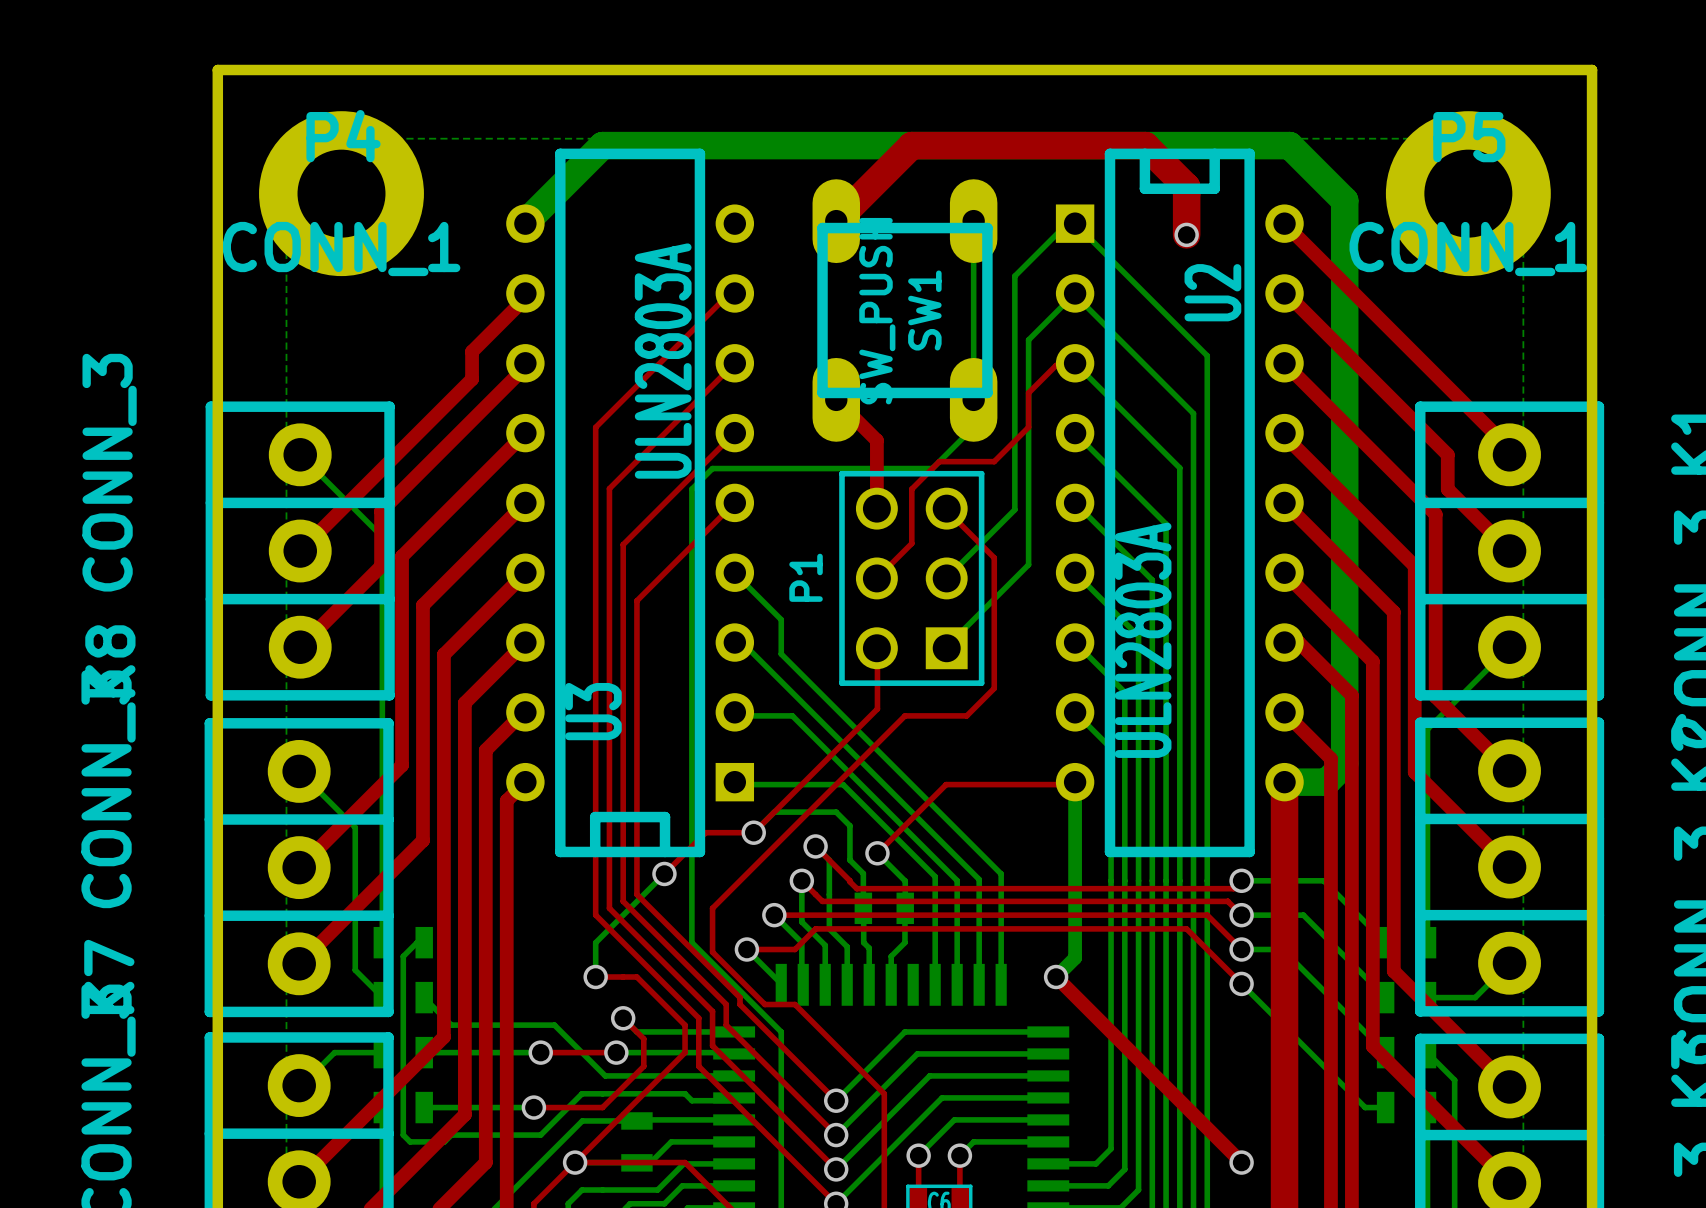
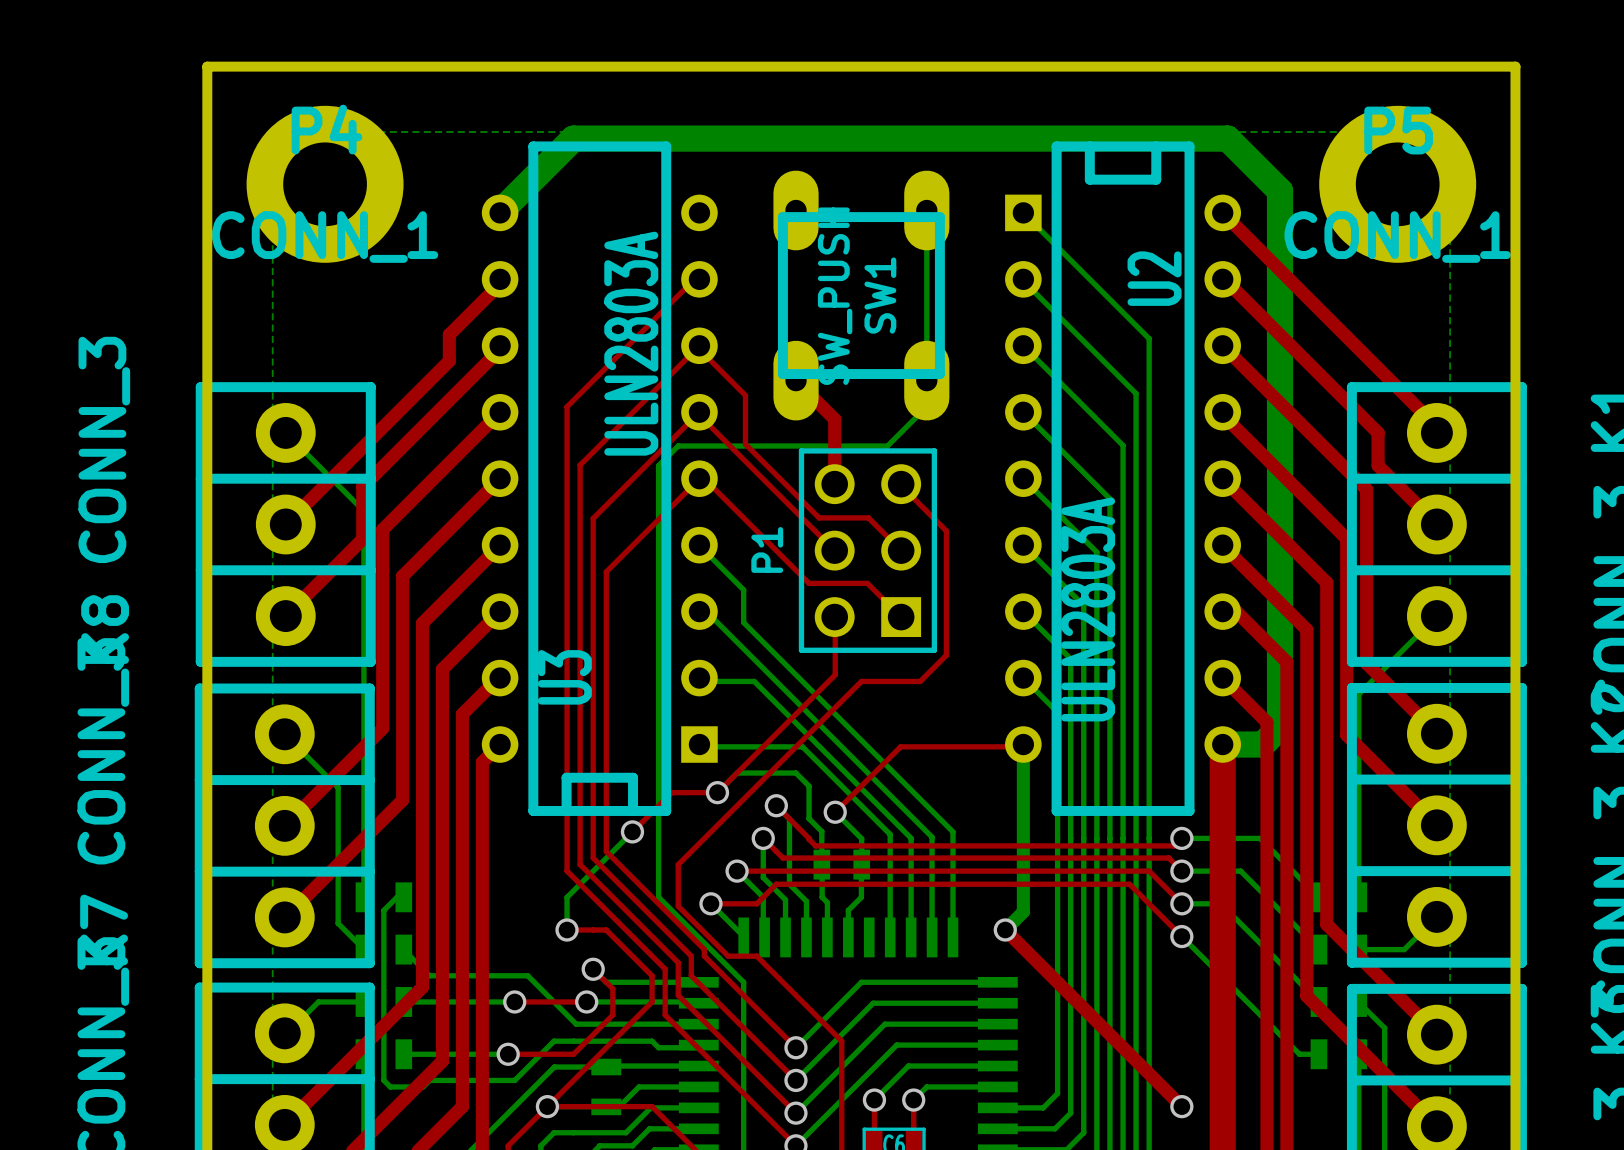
top track: (836, 221) (911, 145) (1145, 145) (1186, 186) (1186, 234) -> none
bottom track: (1075, 223) (1067, 223) (1014, 276) (1014, 509) (946, 578) -> none
via: (1186, 234) -> none
bottom track: (1075, 293) (1028, 339) (1028, 564) (946, 648) -> none
top track: none -> (699, 345) (697, 347) (745, 395) (745, 444) (819, 517) (868, 517) (901, 550)
top track: (1075, 363) (1076, 365) (1056, 365) (1028, 392) (1028, 427) (994, 461) (939, 461) (911, 489) (911, 543) (876, 578) -> (697, 413) (834, 550)
top track: none -> (699, 478) (704, 478) (809, 583) (867, 583) (901, 617)

